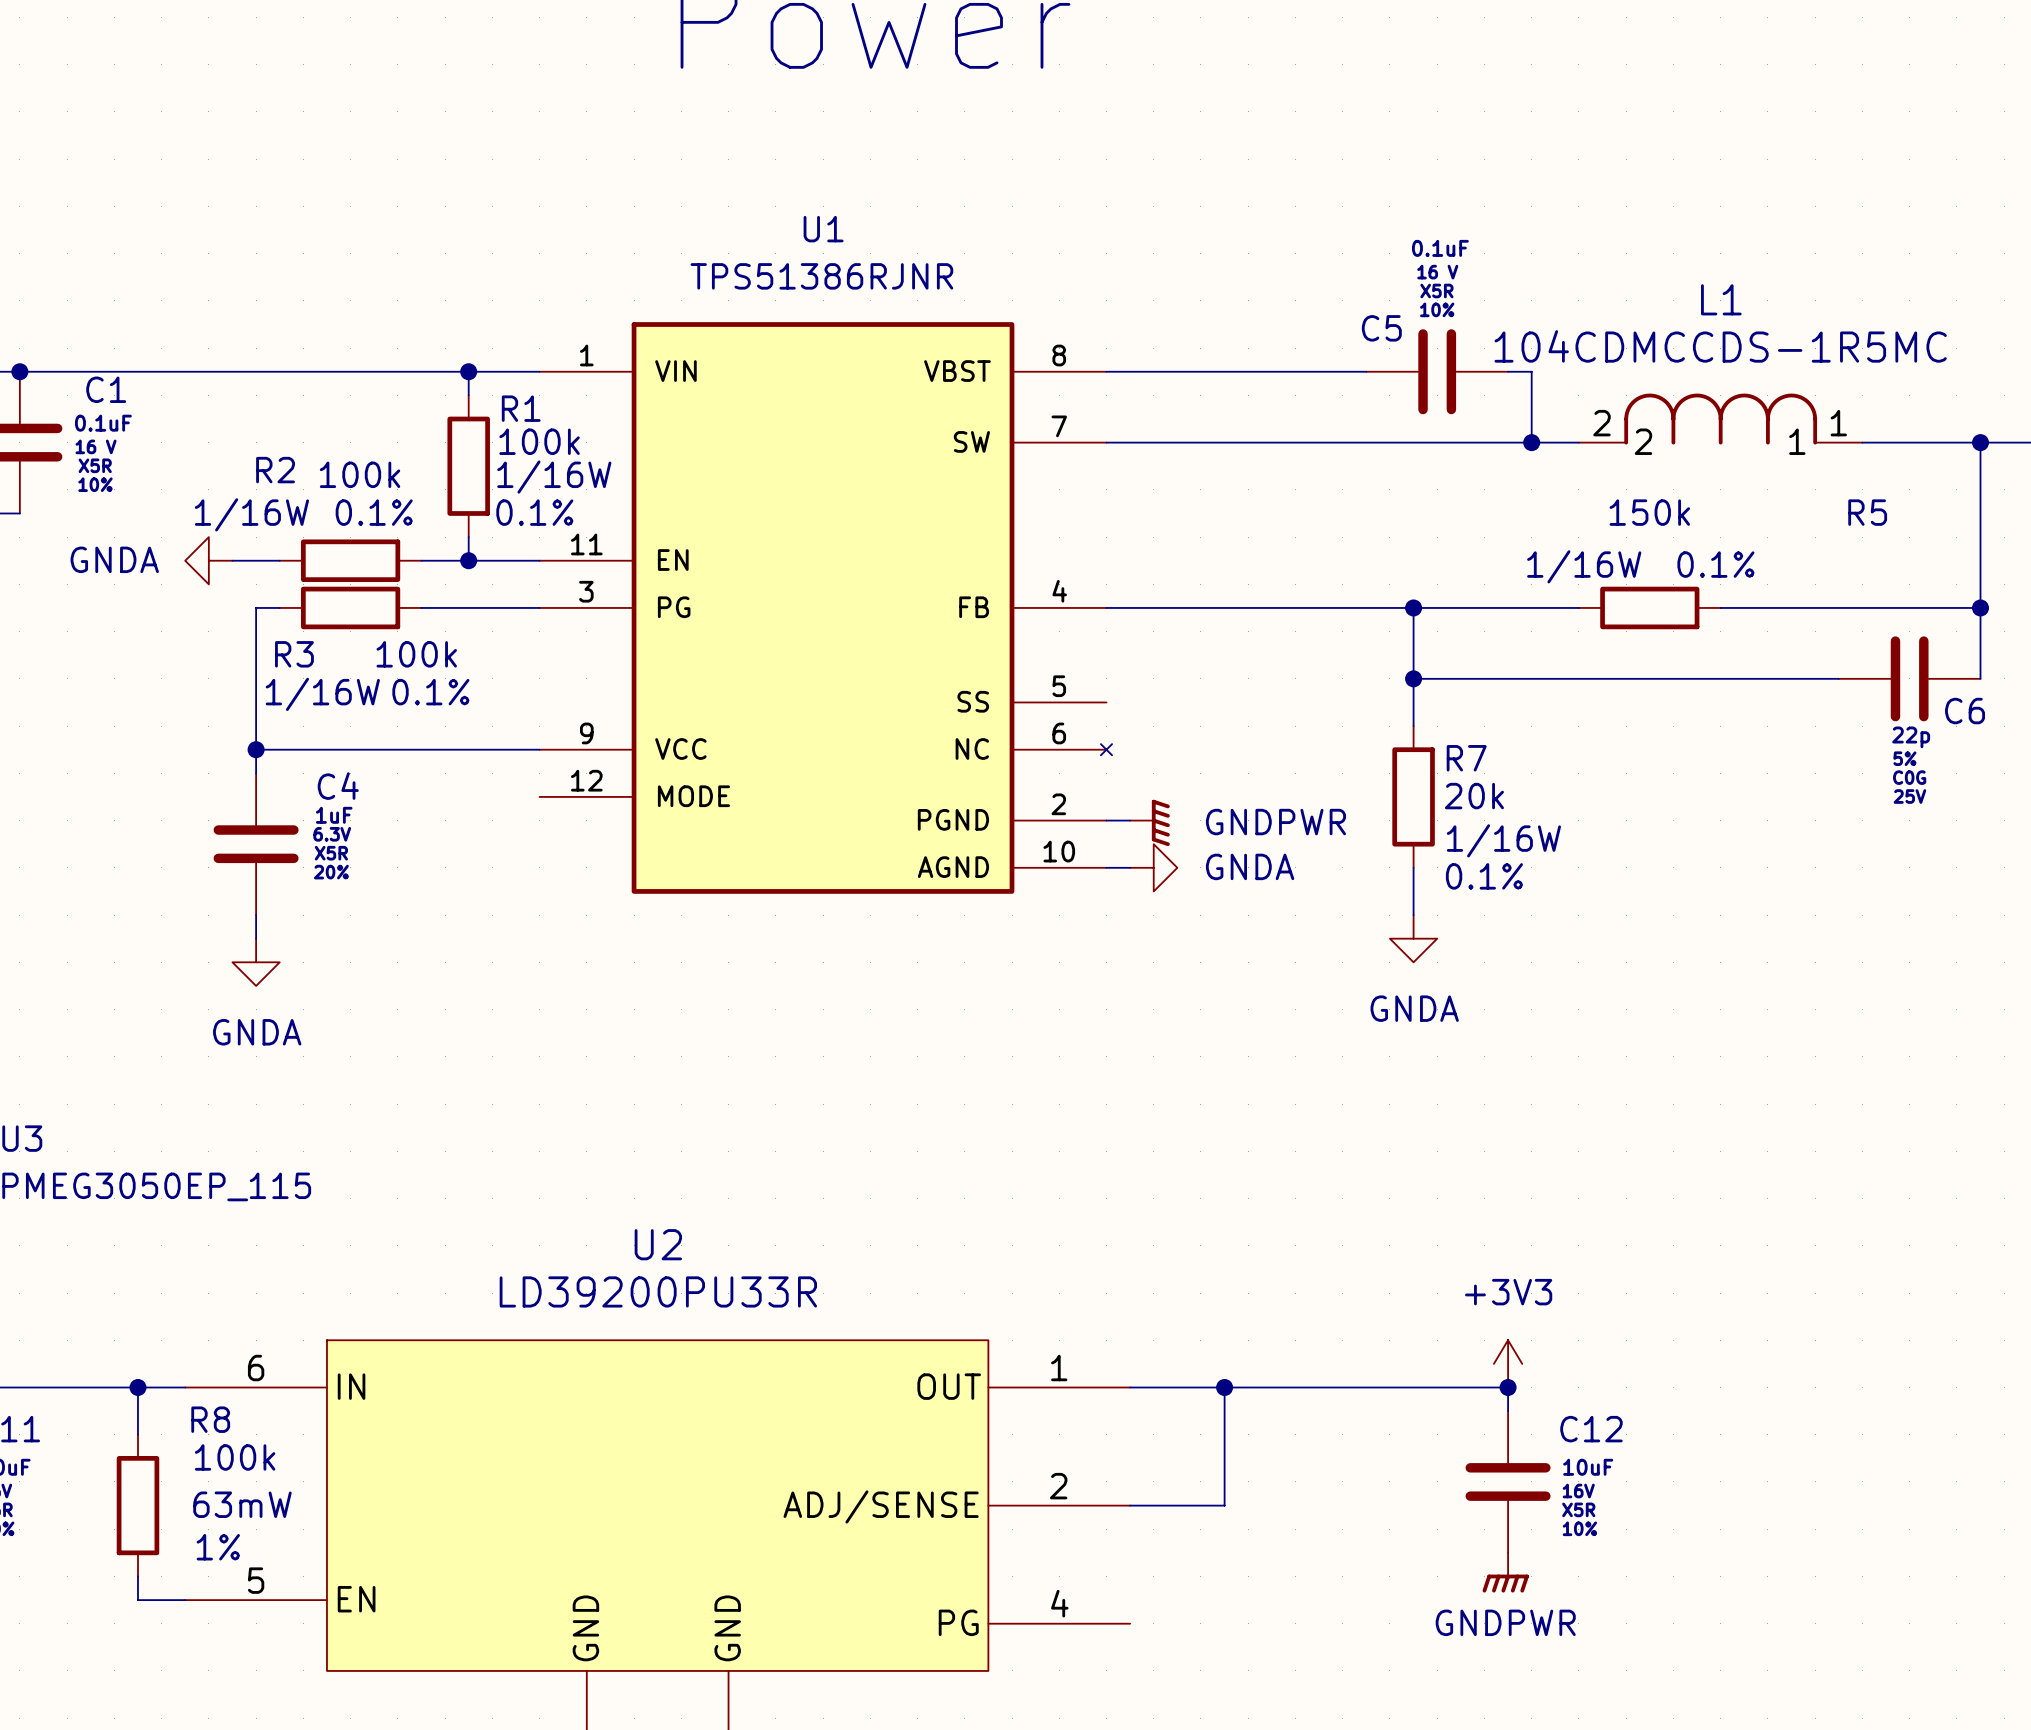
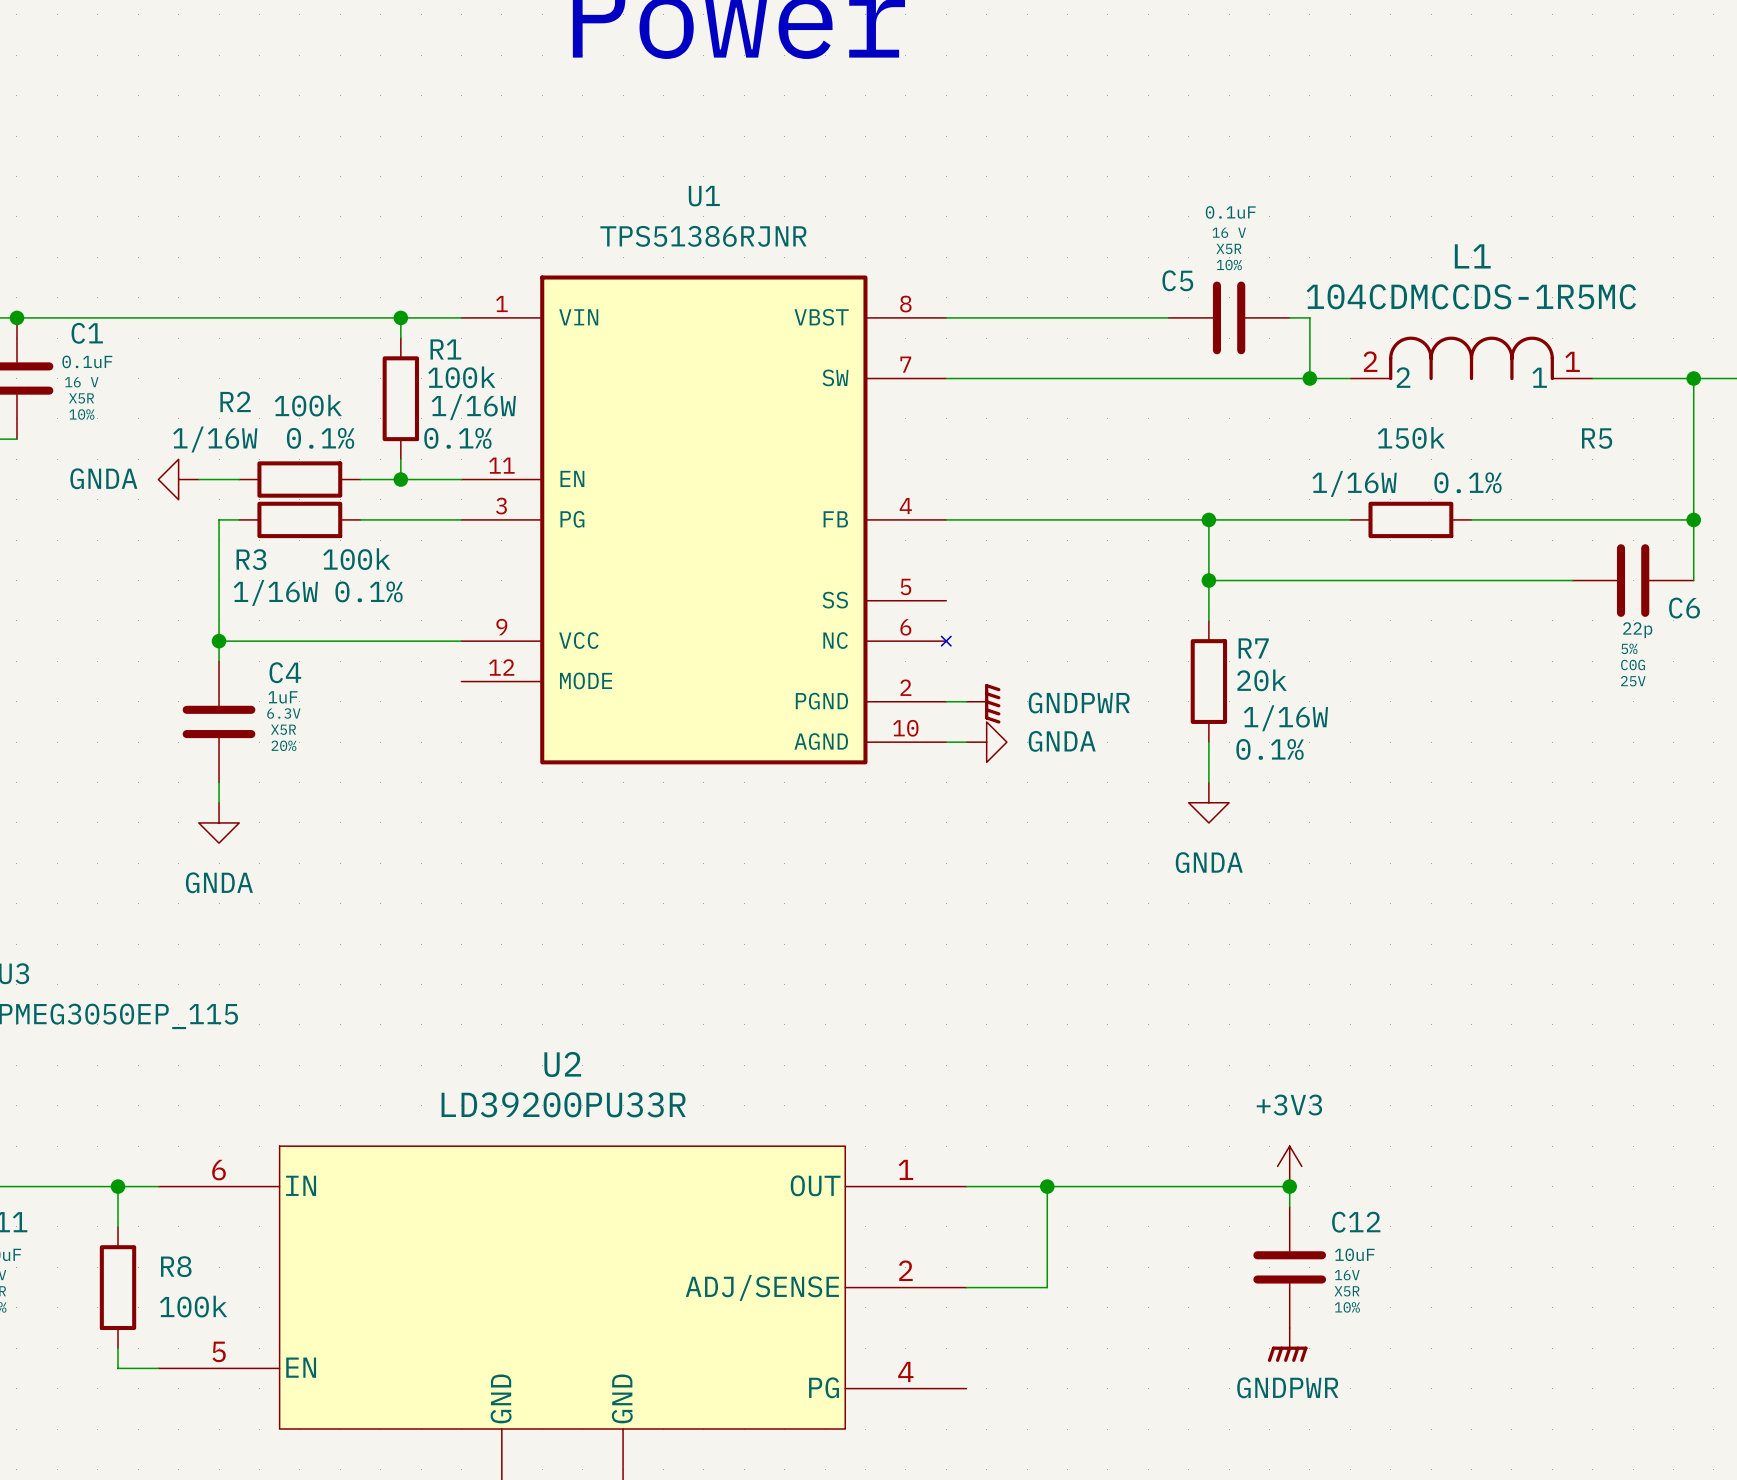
R8 name position: R8 (210, 1419) -> R8 (176, 1266)
R8 value position: 100k (235, 1457) -> 100k (193, 1306)
R8 text: 63mW (242, 1504) -> none
R8 text: 1% (218, 1547) -> none

